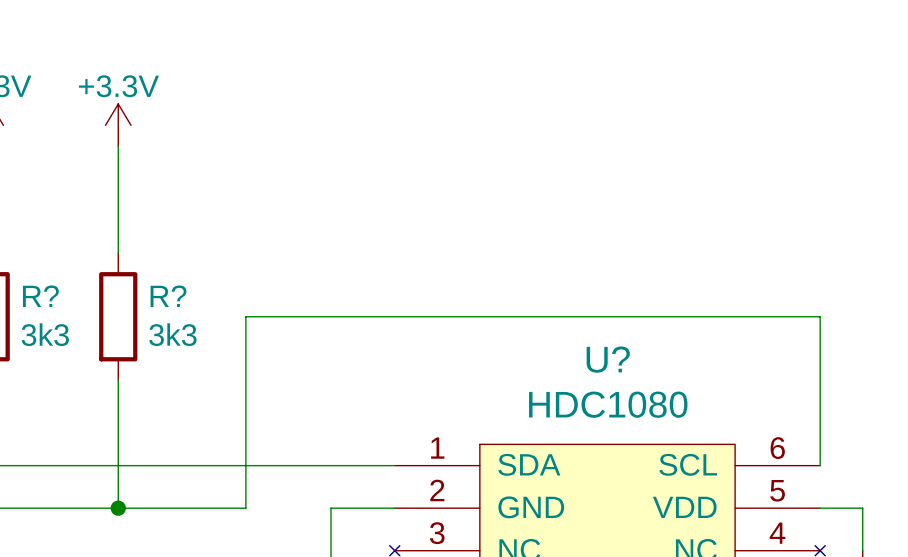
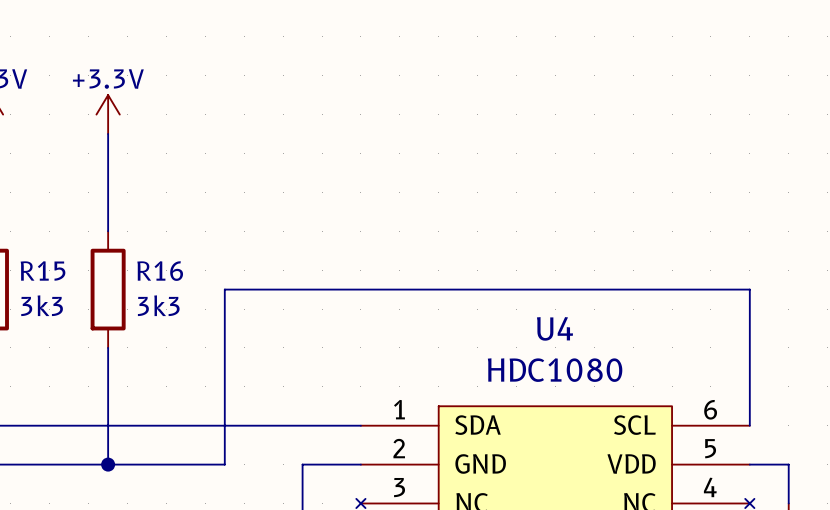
R? name: R? (40, 296) -> R15 (43, 270)
R? name: R? (168, 296) -> R16 (160, 271)
U? name: U? (608, 359) -> U4 (554, 328)

